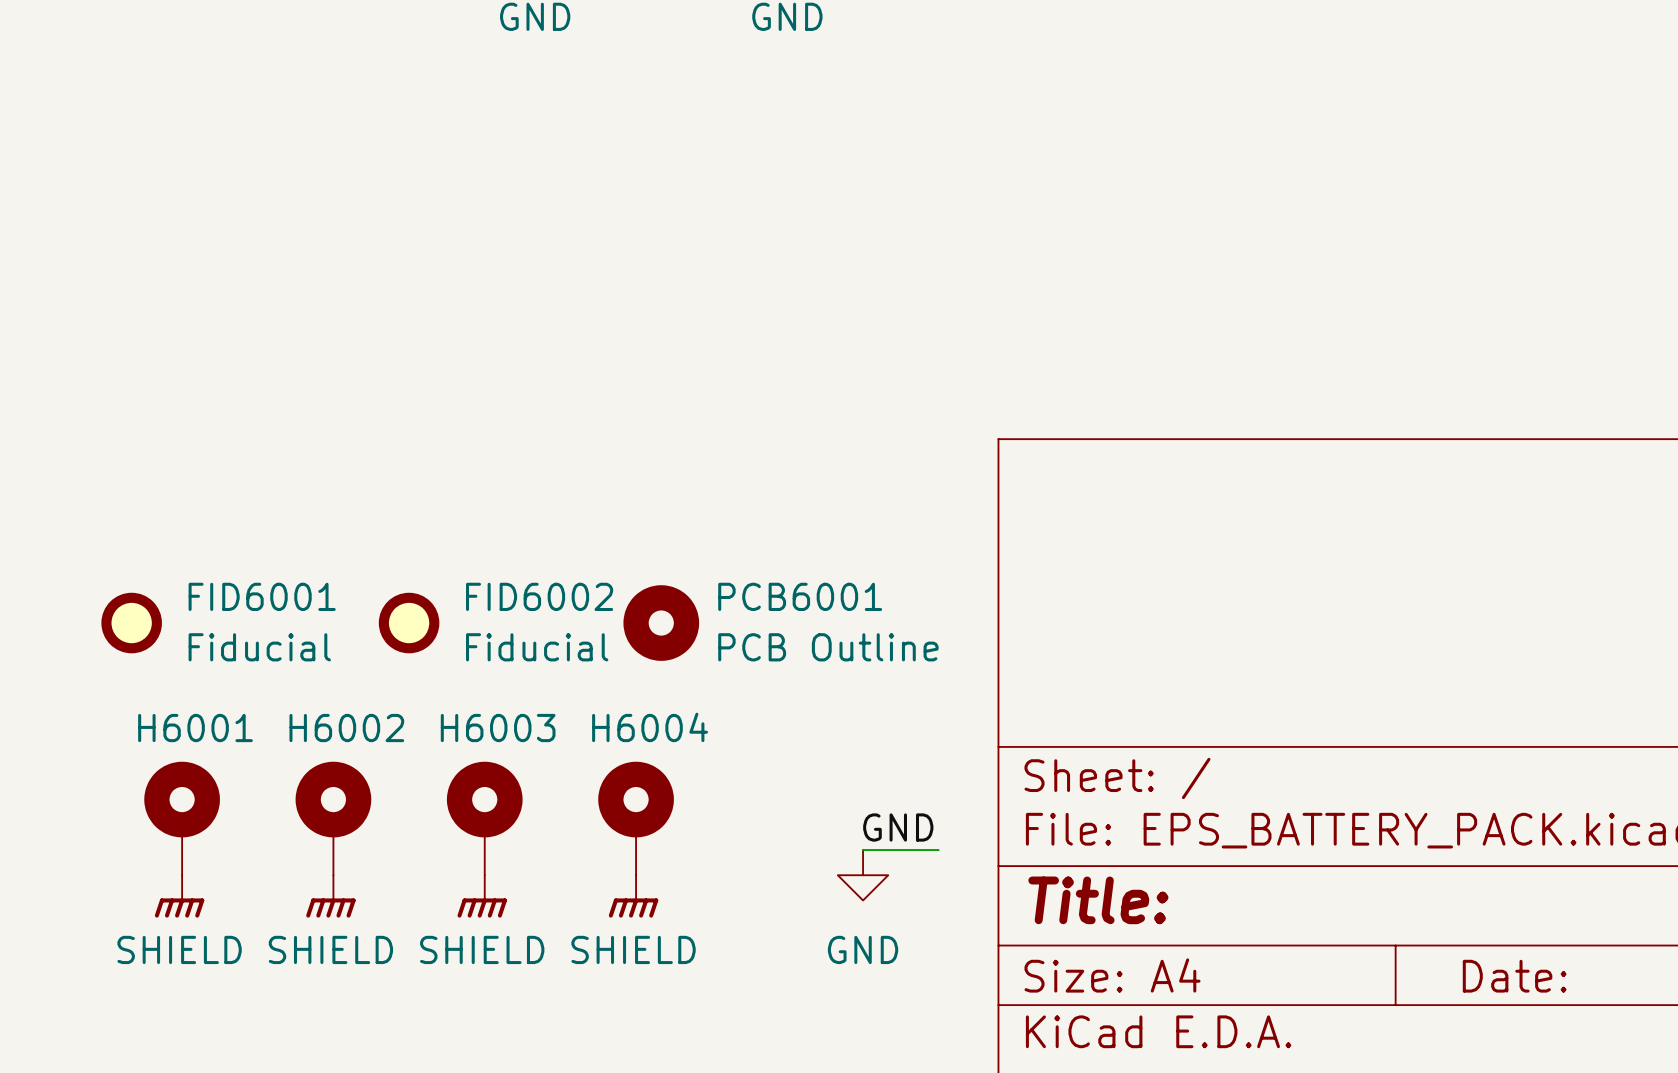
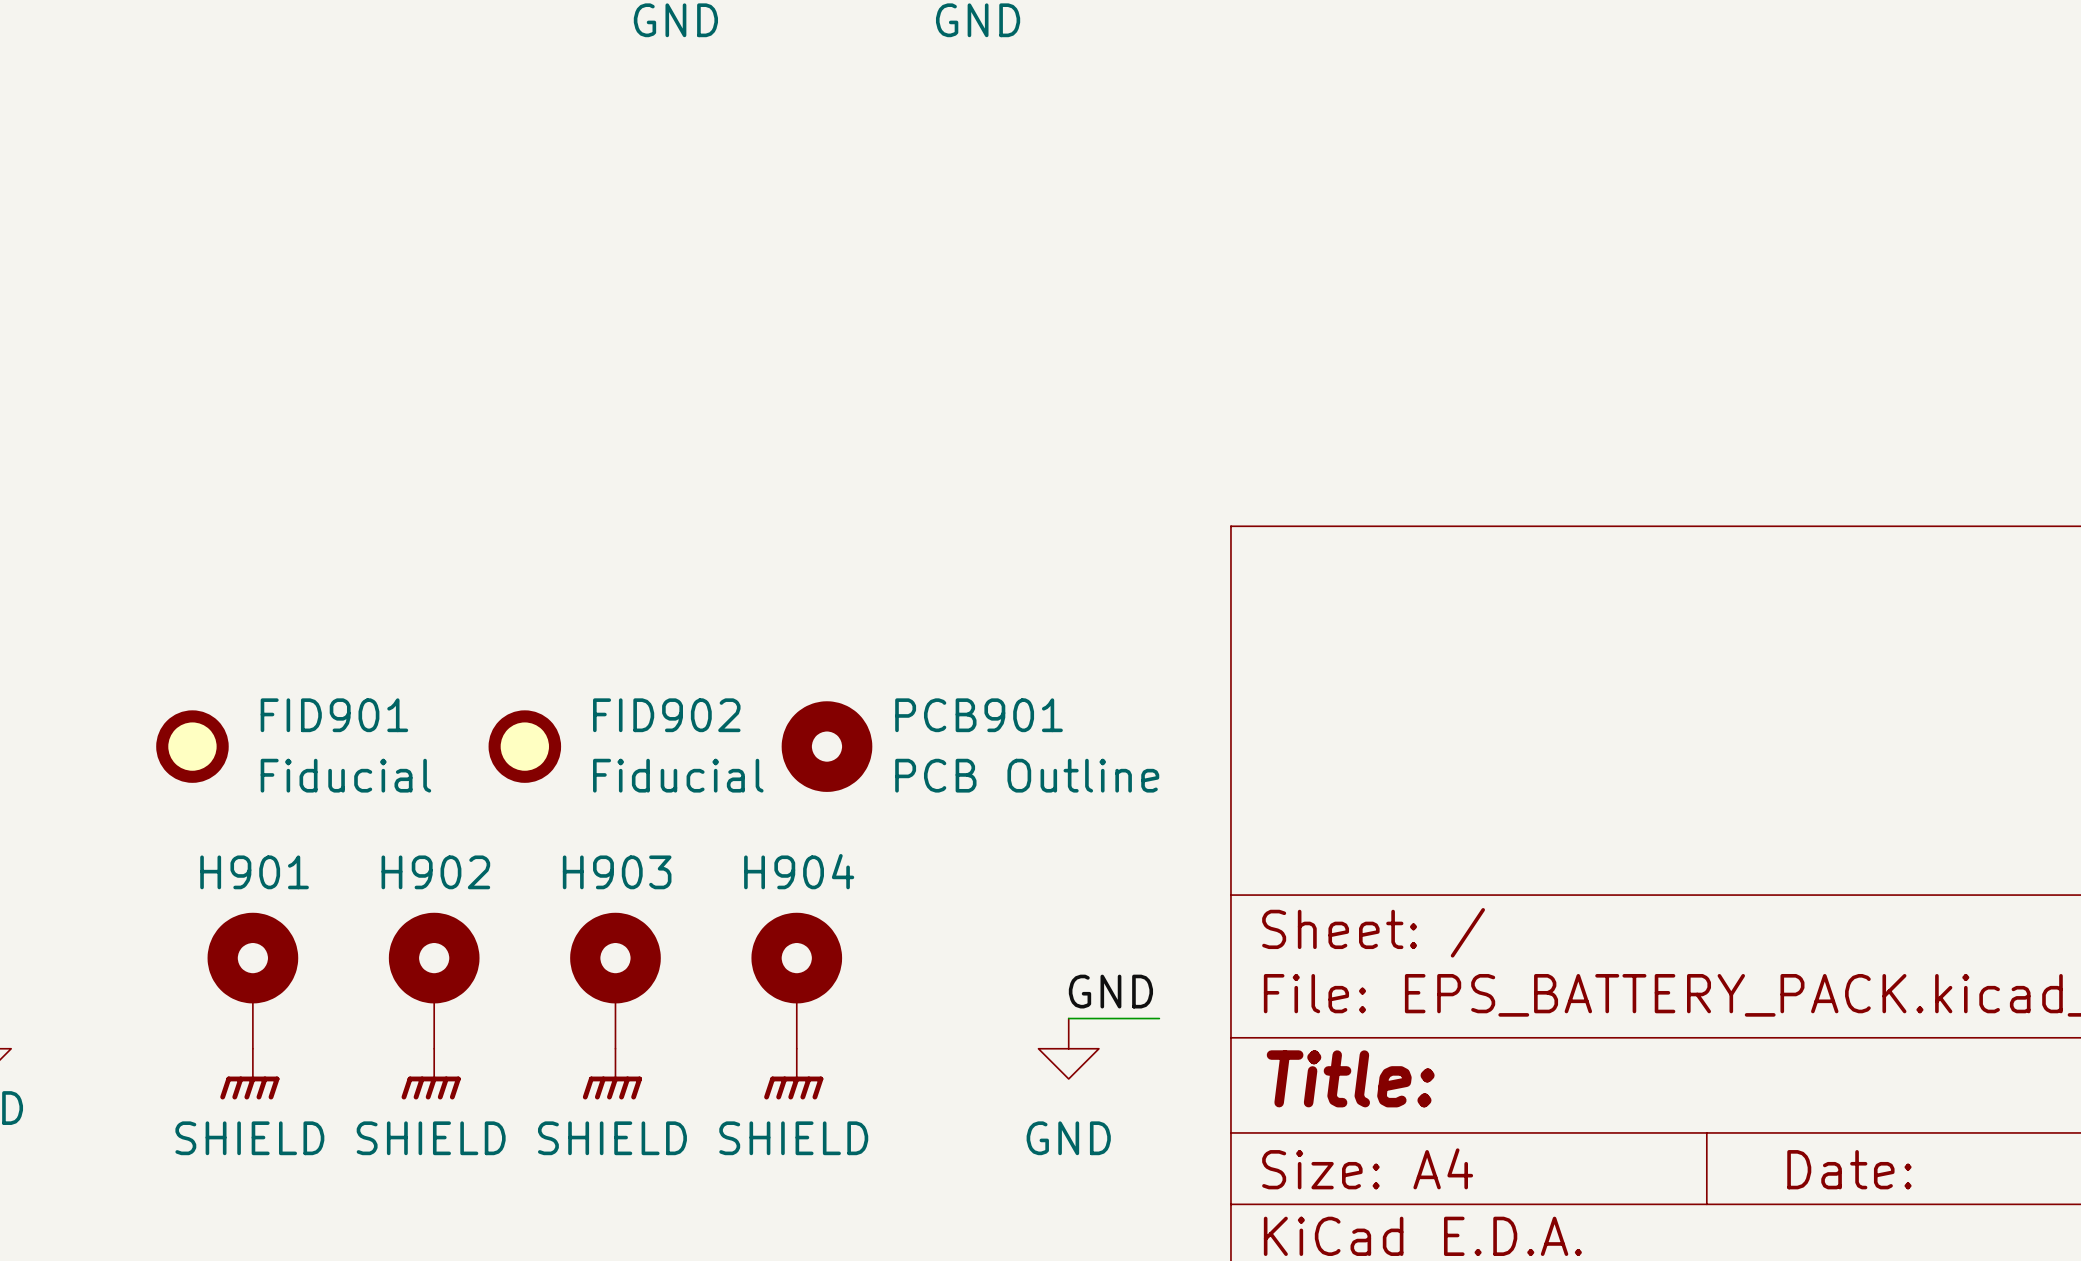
FID6001 name: FID6001 (262, 596) -> FID901 (334, 715)
FID6002 name: FID6002 (539, 596) -> FID902 (666, 715)
PCB6001 name: PCB6001 (800, 596) -> PCB901 (979, 715)
H6004 name: H6004 (650, 727) -> H904 (799, 871)
H6001 name: H6001 (195, 728) -> H901 (254, 872)
H6002 name: H6002 (346, 728) -> H902 (435, 872)
H6003 name: H6003 (498, 728) -> H903 (617, 872)

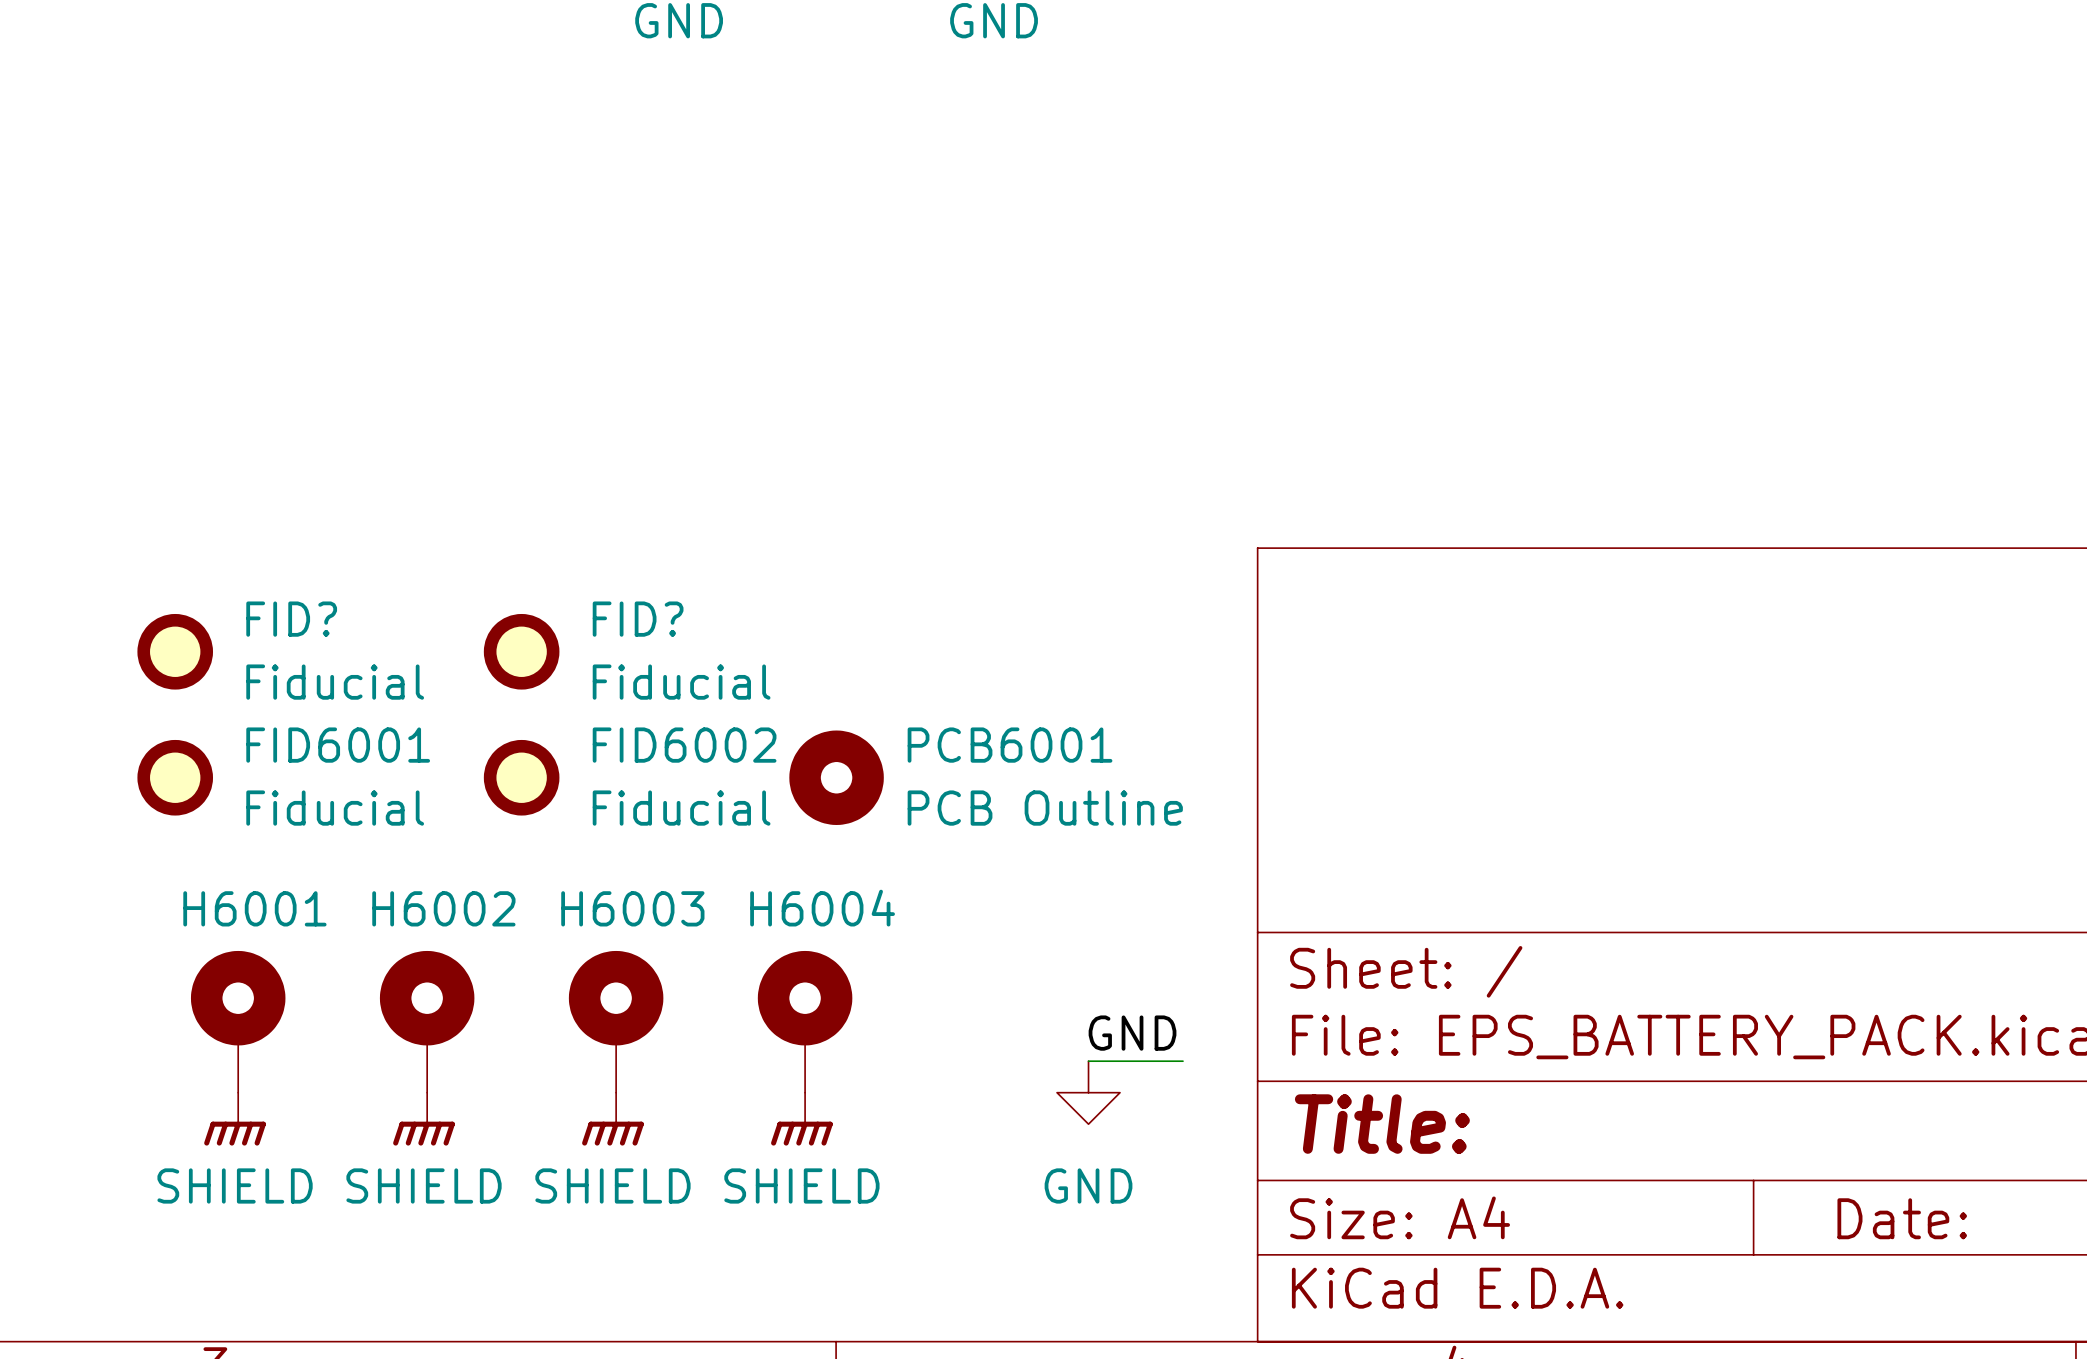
FID?: none -> Fiducial (175, 651)
FID?: none -> Fiducial (521, 651)
FID901 name: FID901 (334, 715) -> FID6001 (338, 745)
FID902 name: FID902 (666, 715) -> FID6002 (684, 745)
PCB901 name: PCB901 (979, 715) -> PCB6001 (1010, 745)
H904 name: H904 (799, 871) -> H6004 (822, 908)
H901 name: H901 (254, 872) -> H6001 (254, 908)
H902 name: H902 (435, 872) -> H6002 (443, 908)
H903 name: H903 (617, 872) -> H6003 (632, 908)

